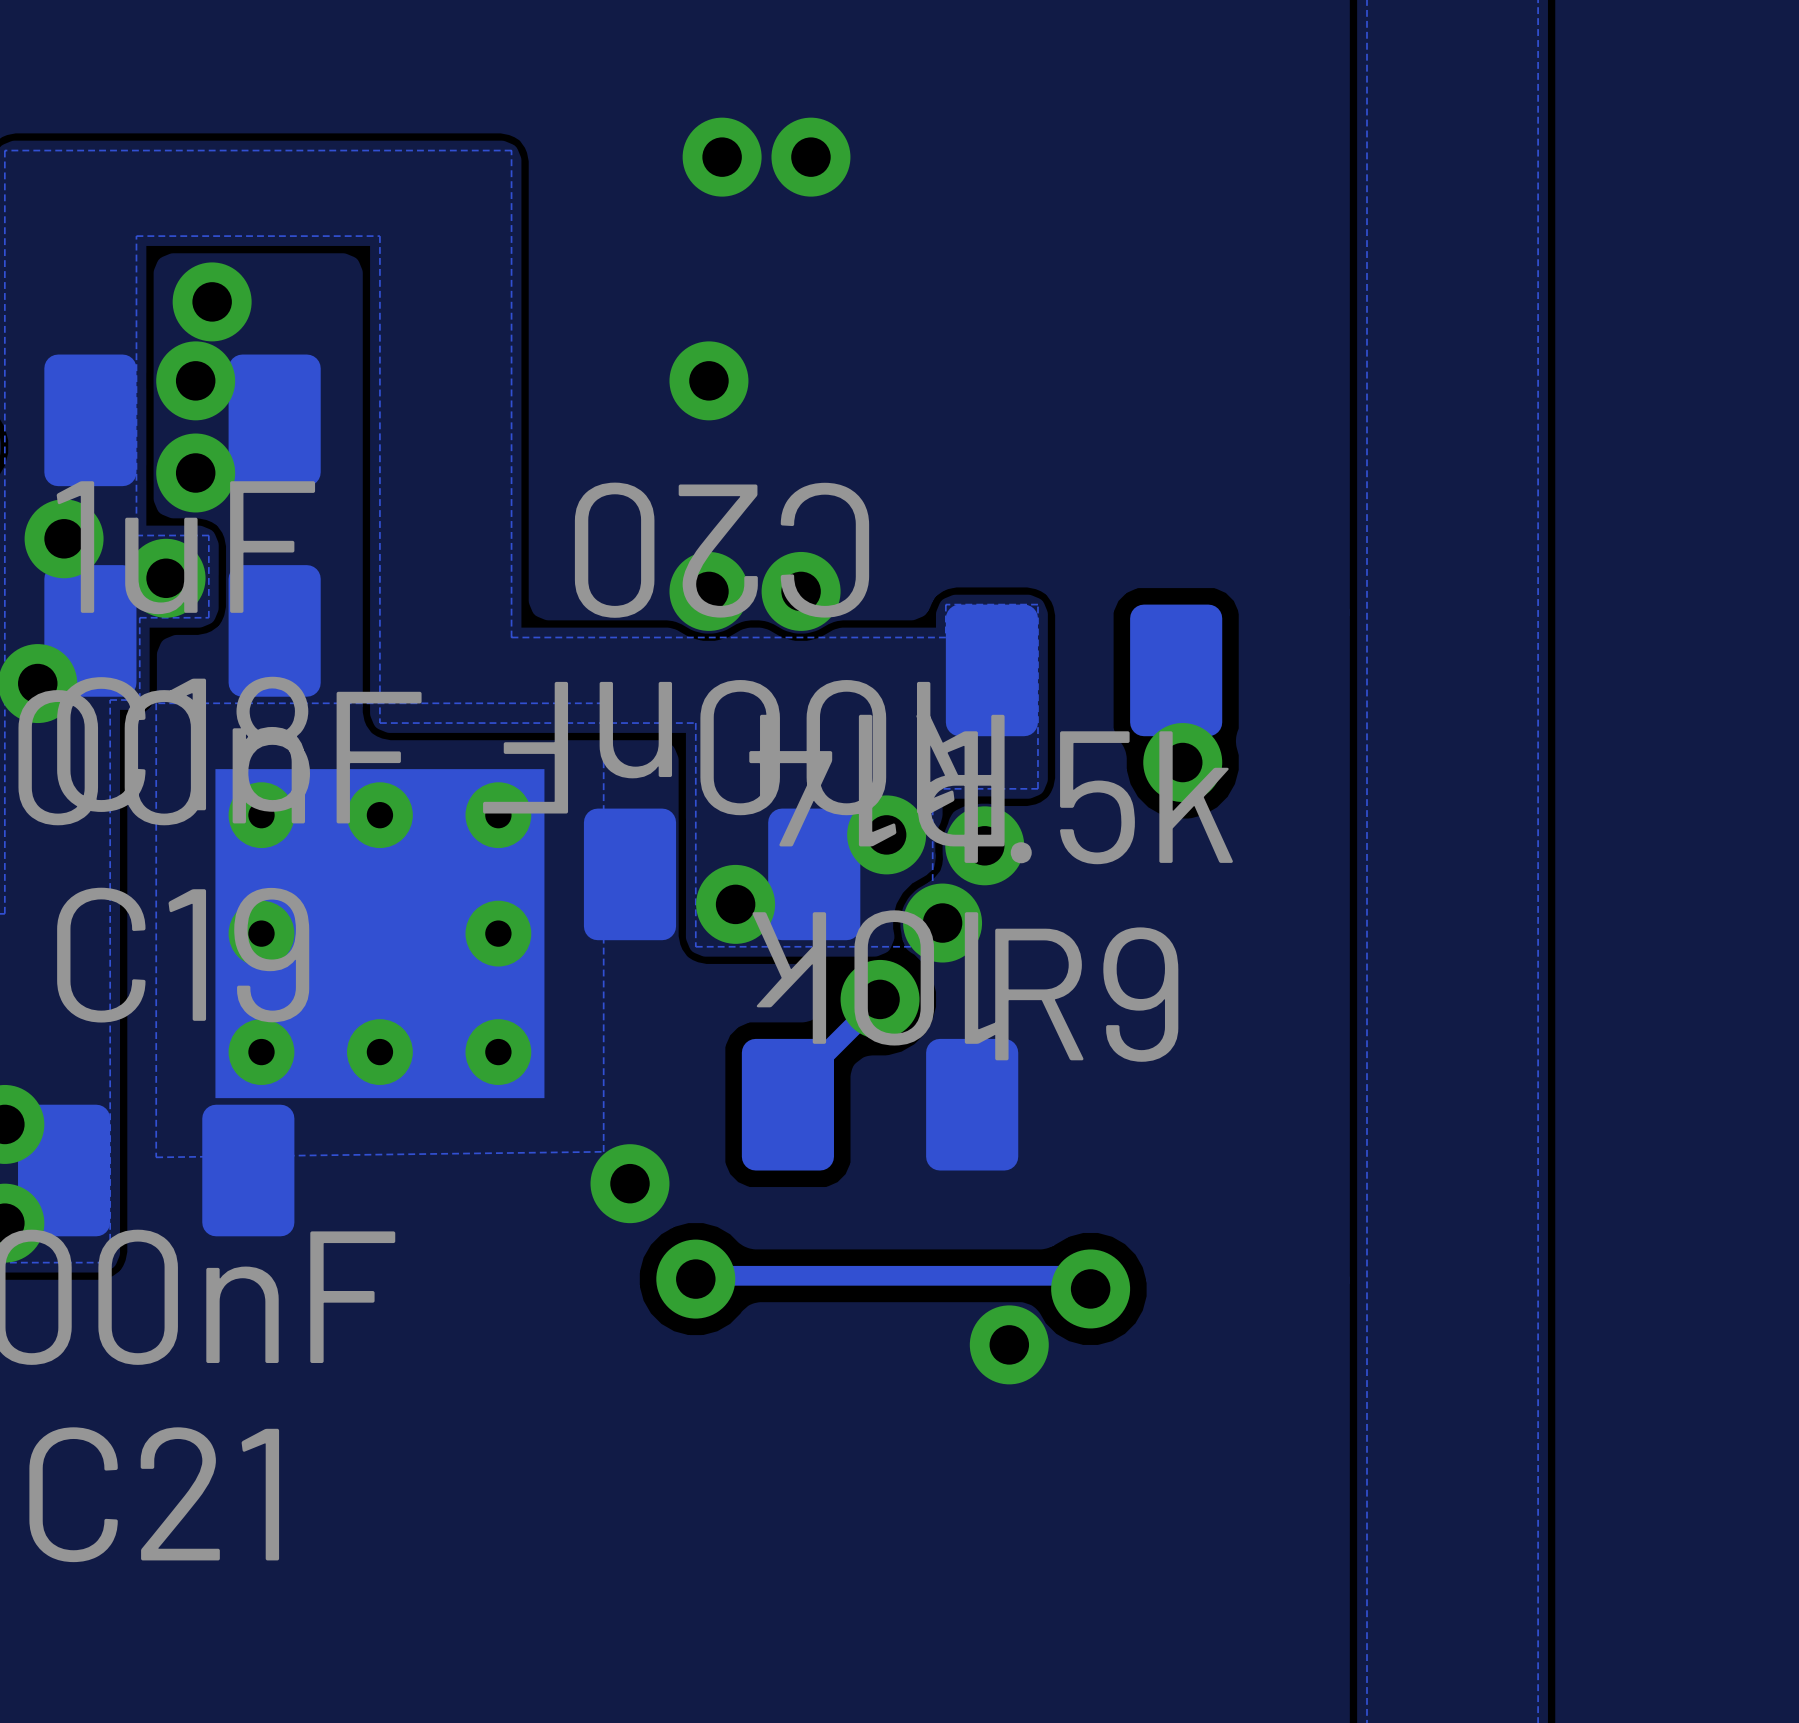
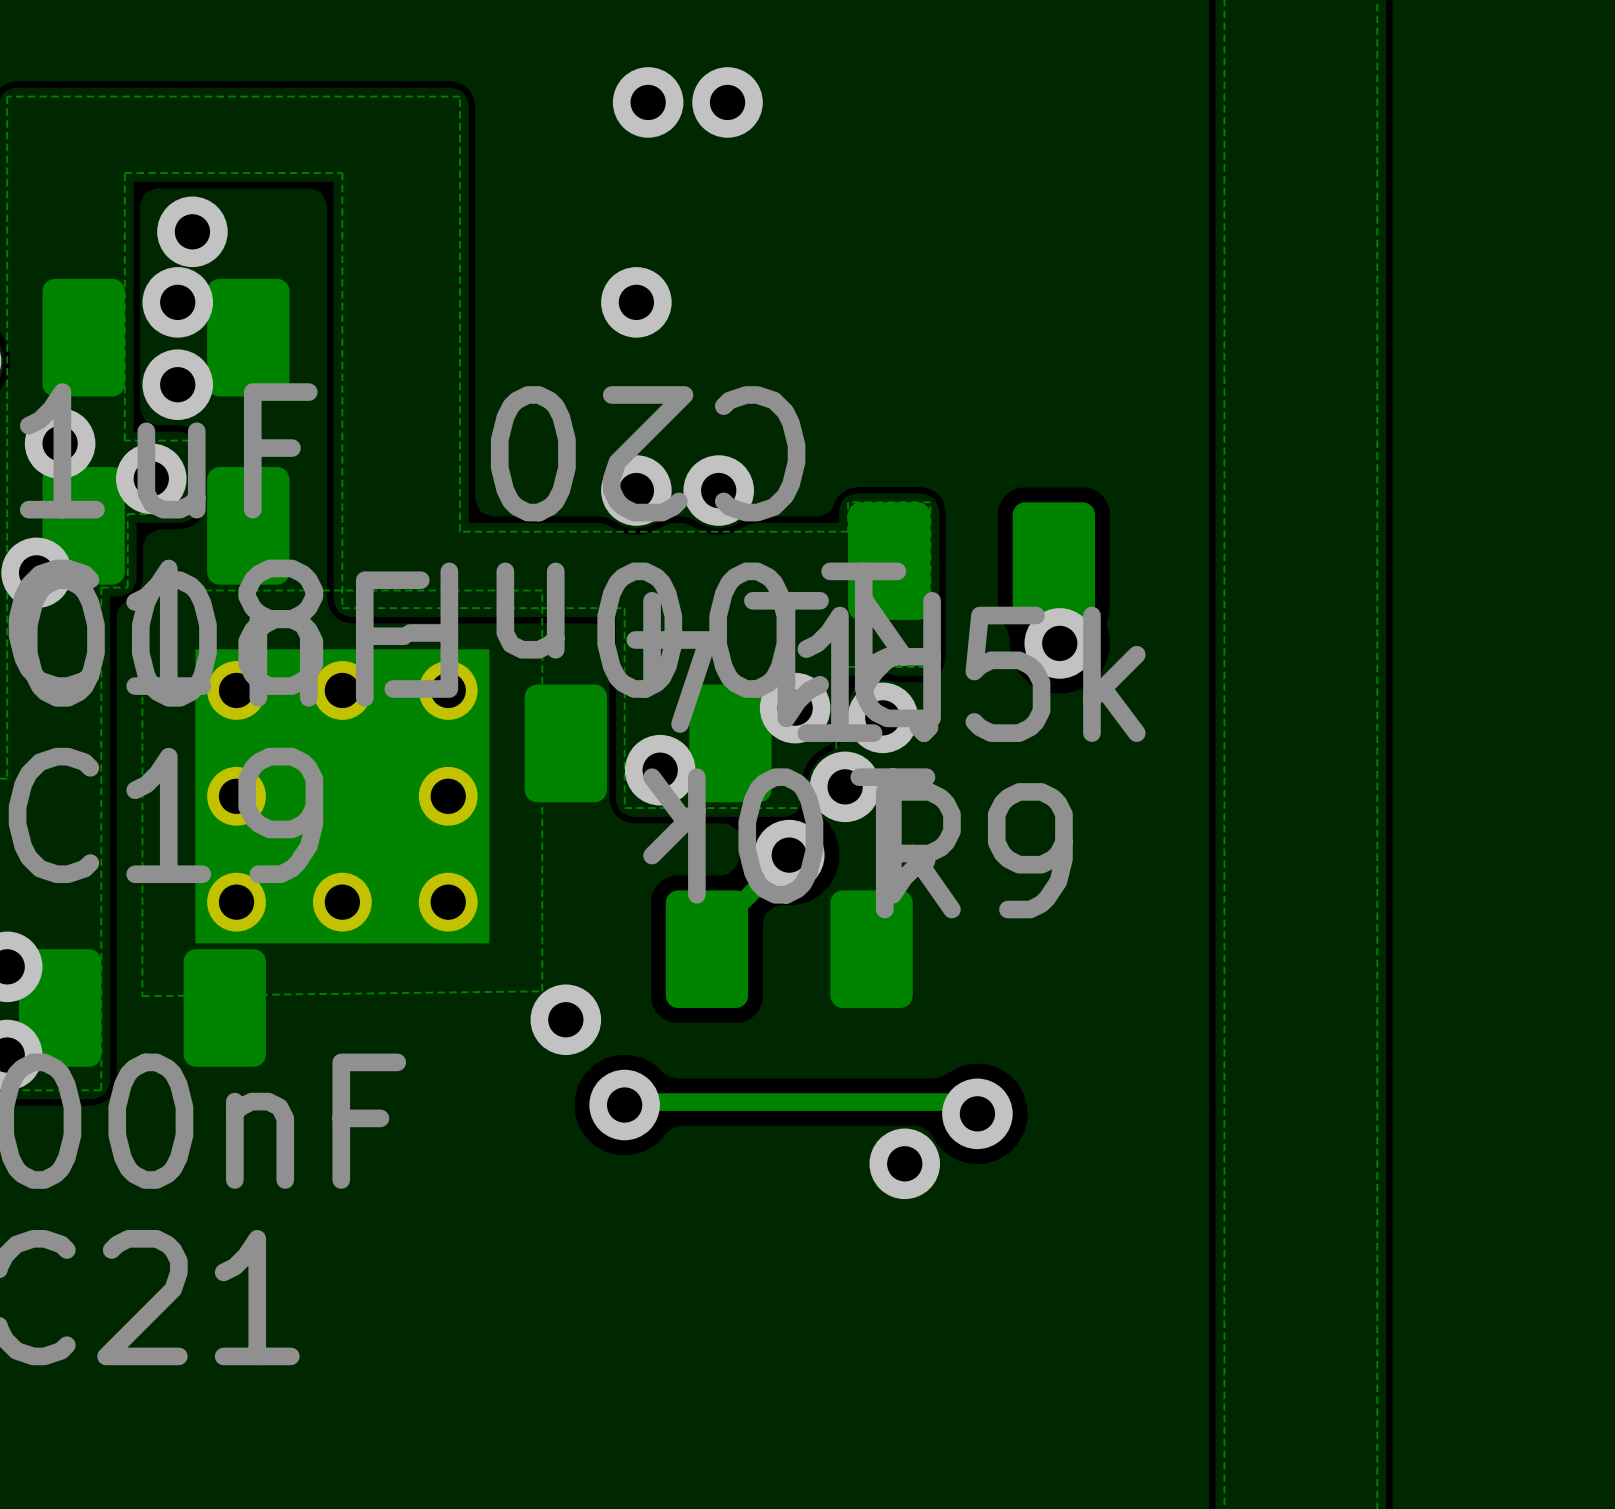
part footprint: [215, 769, 545, 1099] -> [195, 649, 490, 944]

